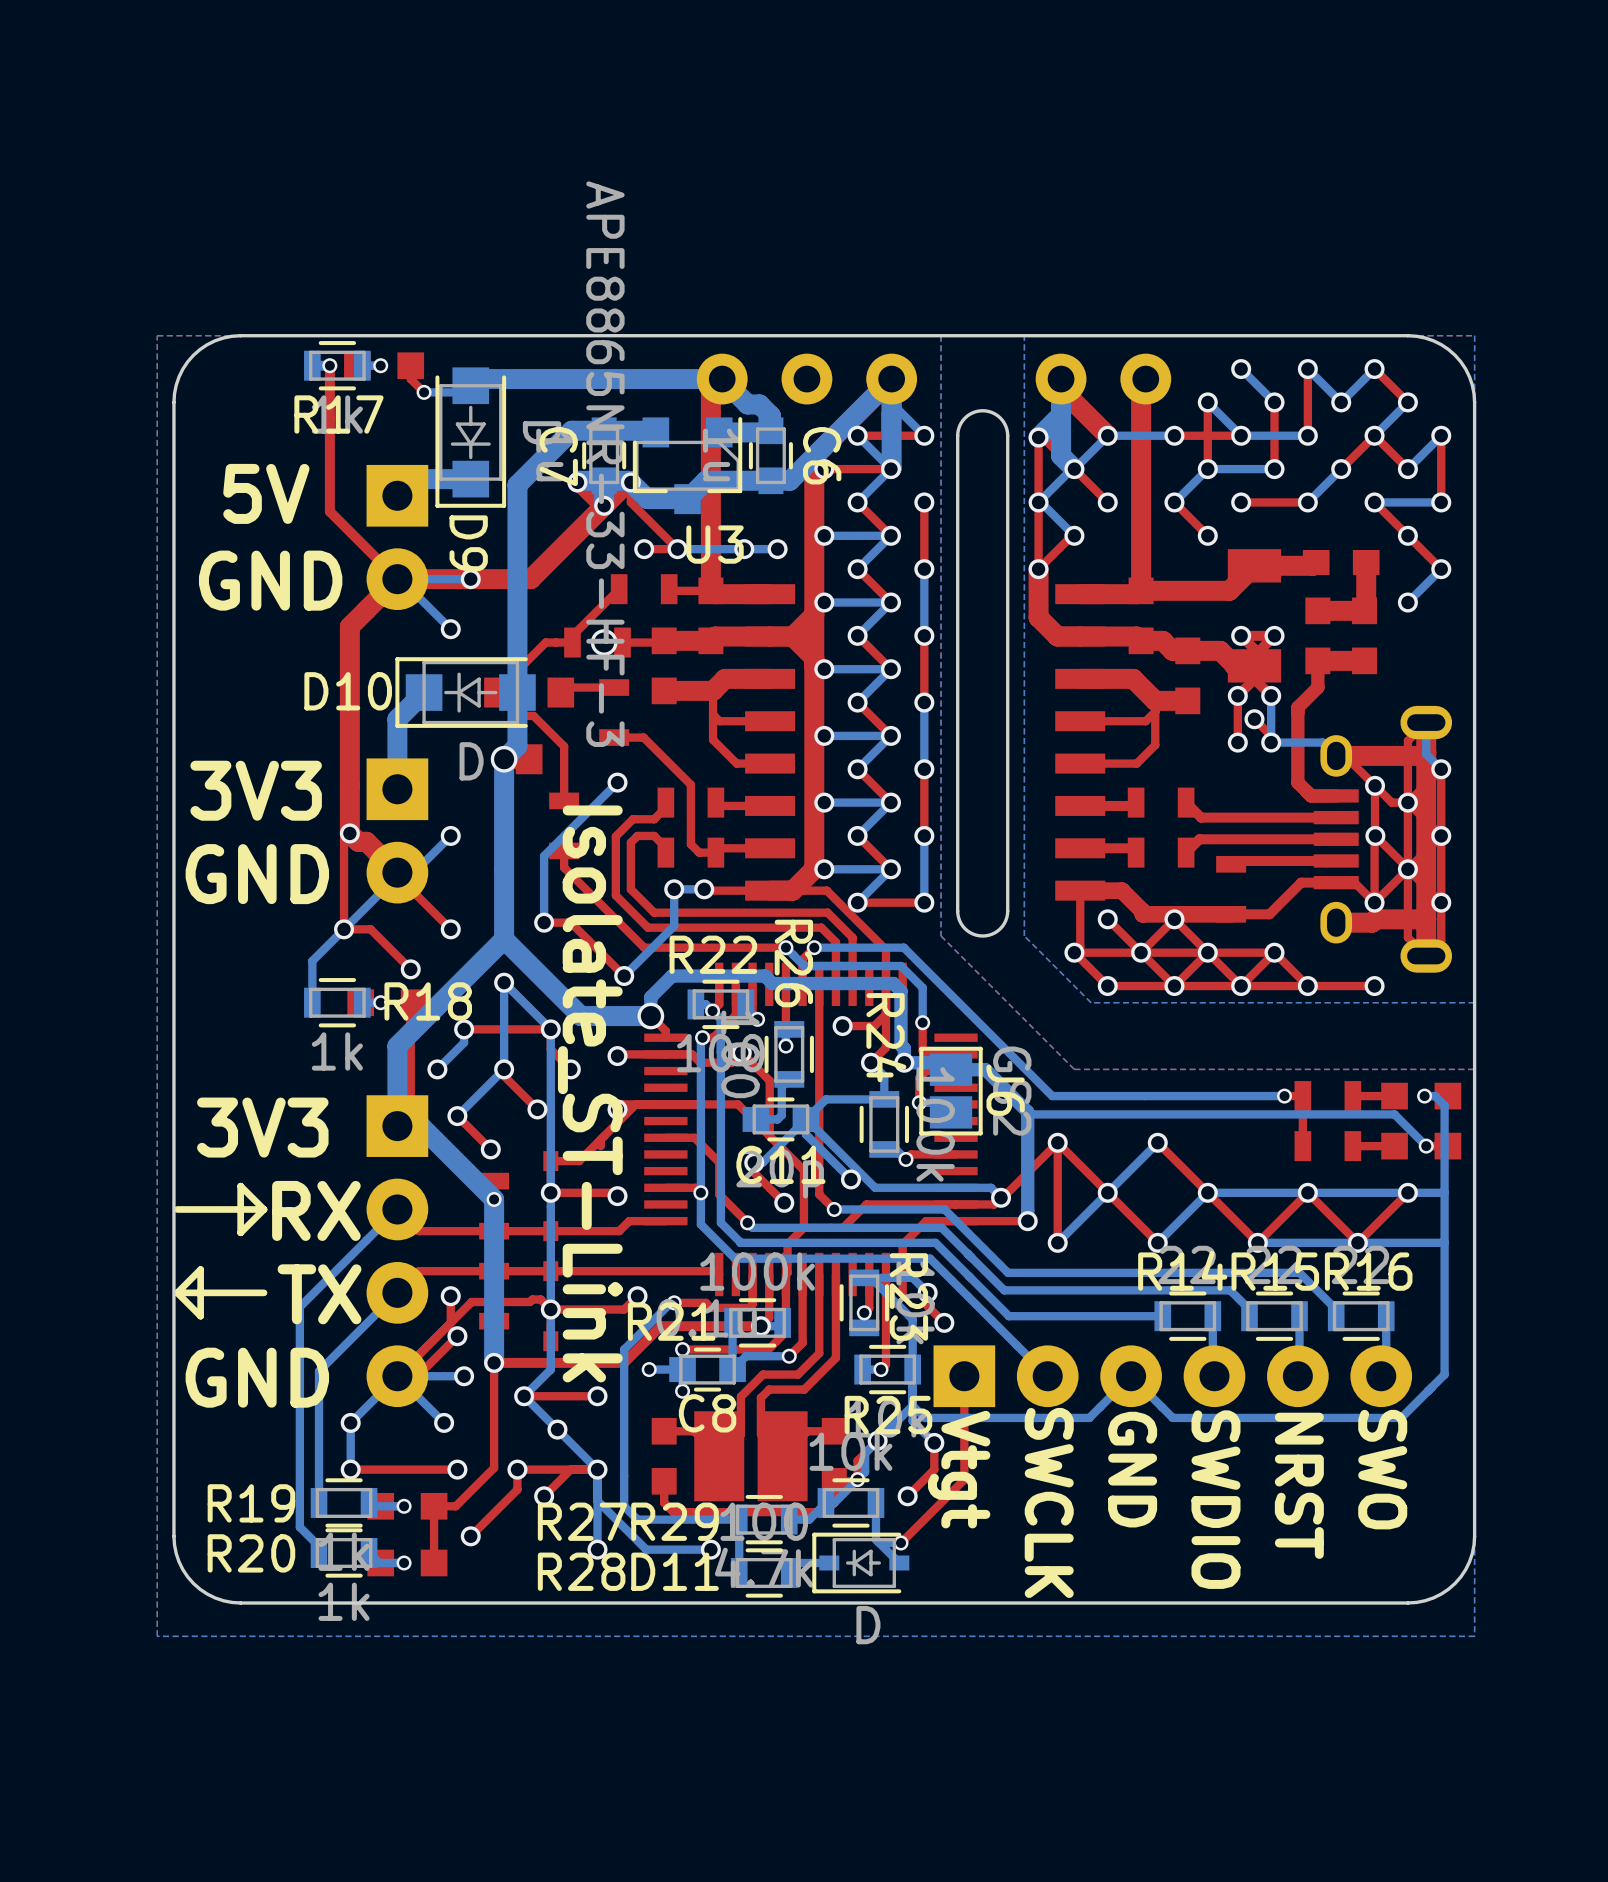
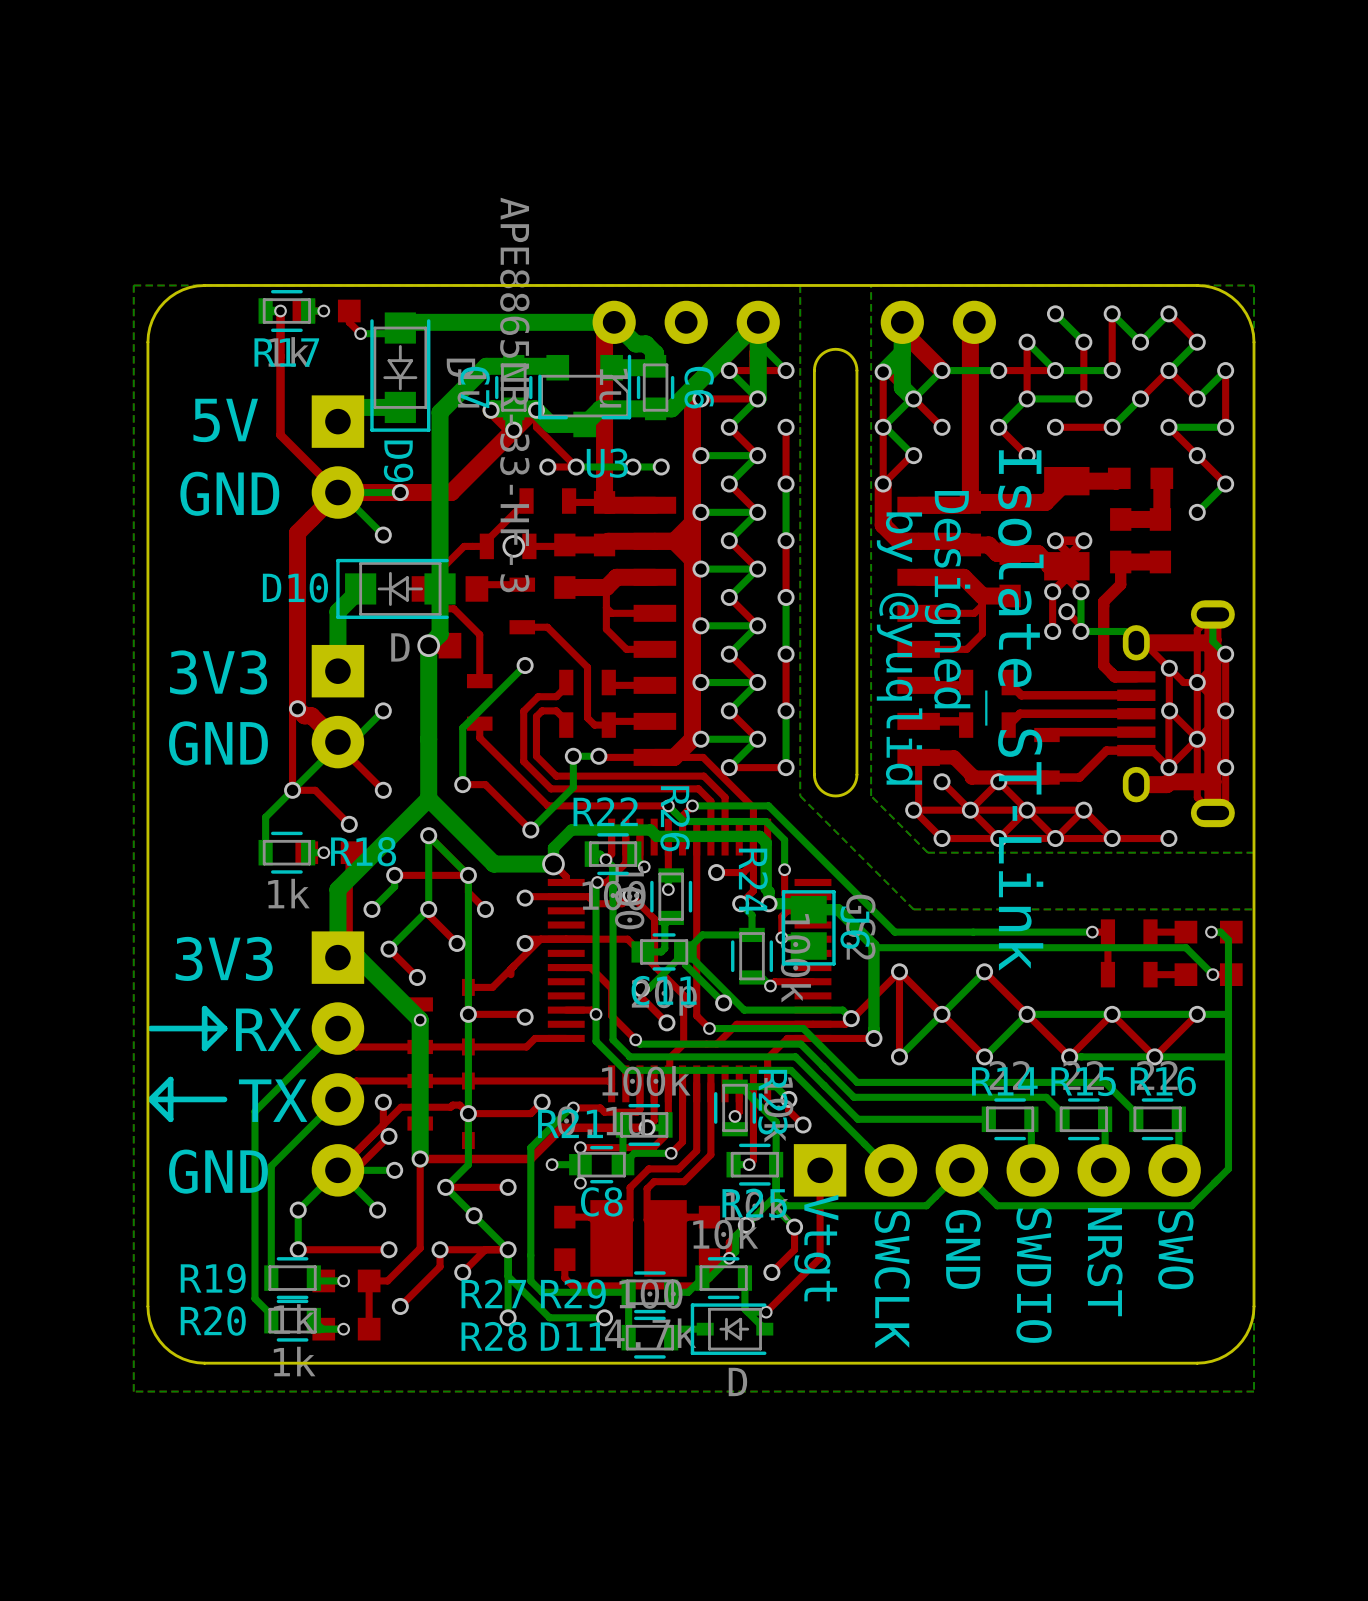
text: none -> Designed (947, 599)
text: none -> by @yuqlid (899, 648)
text position: Isolate_ST-Link (590, 1093) -> Isolate_ST-Link (1014, 710)

